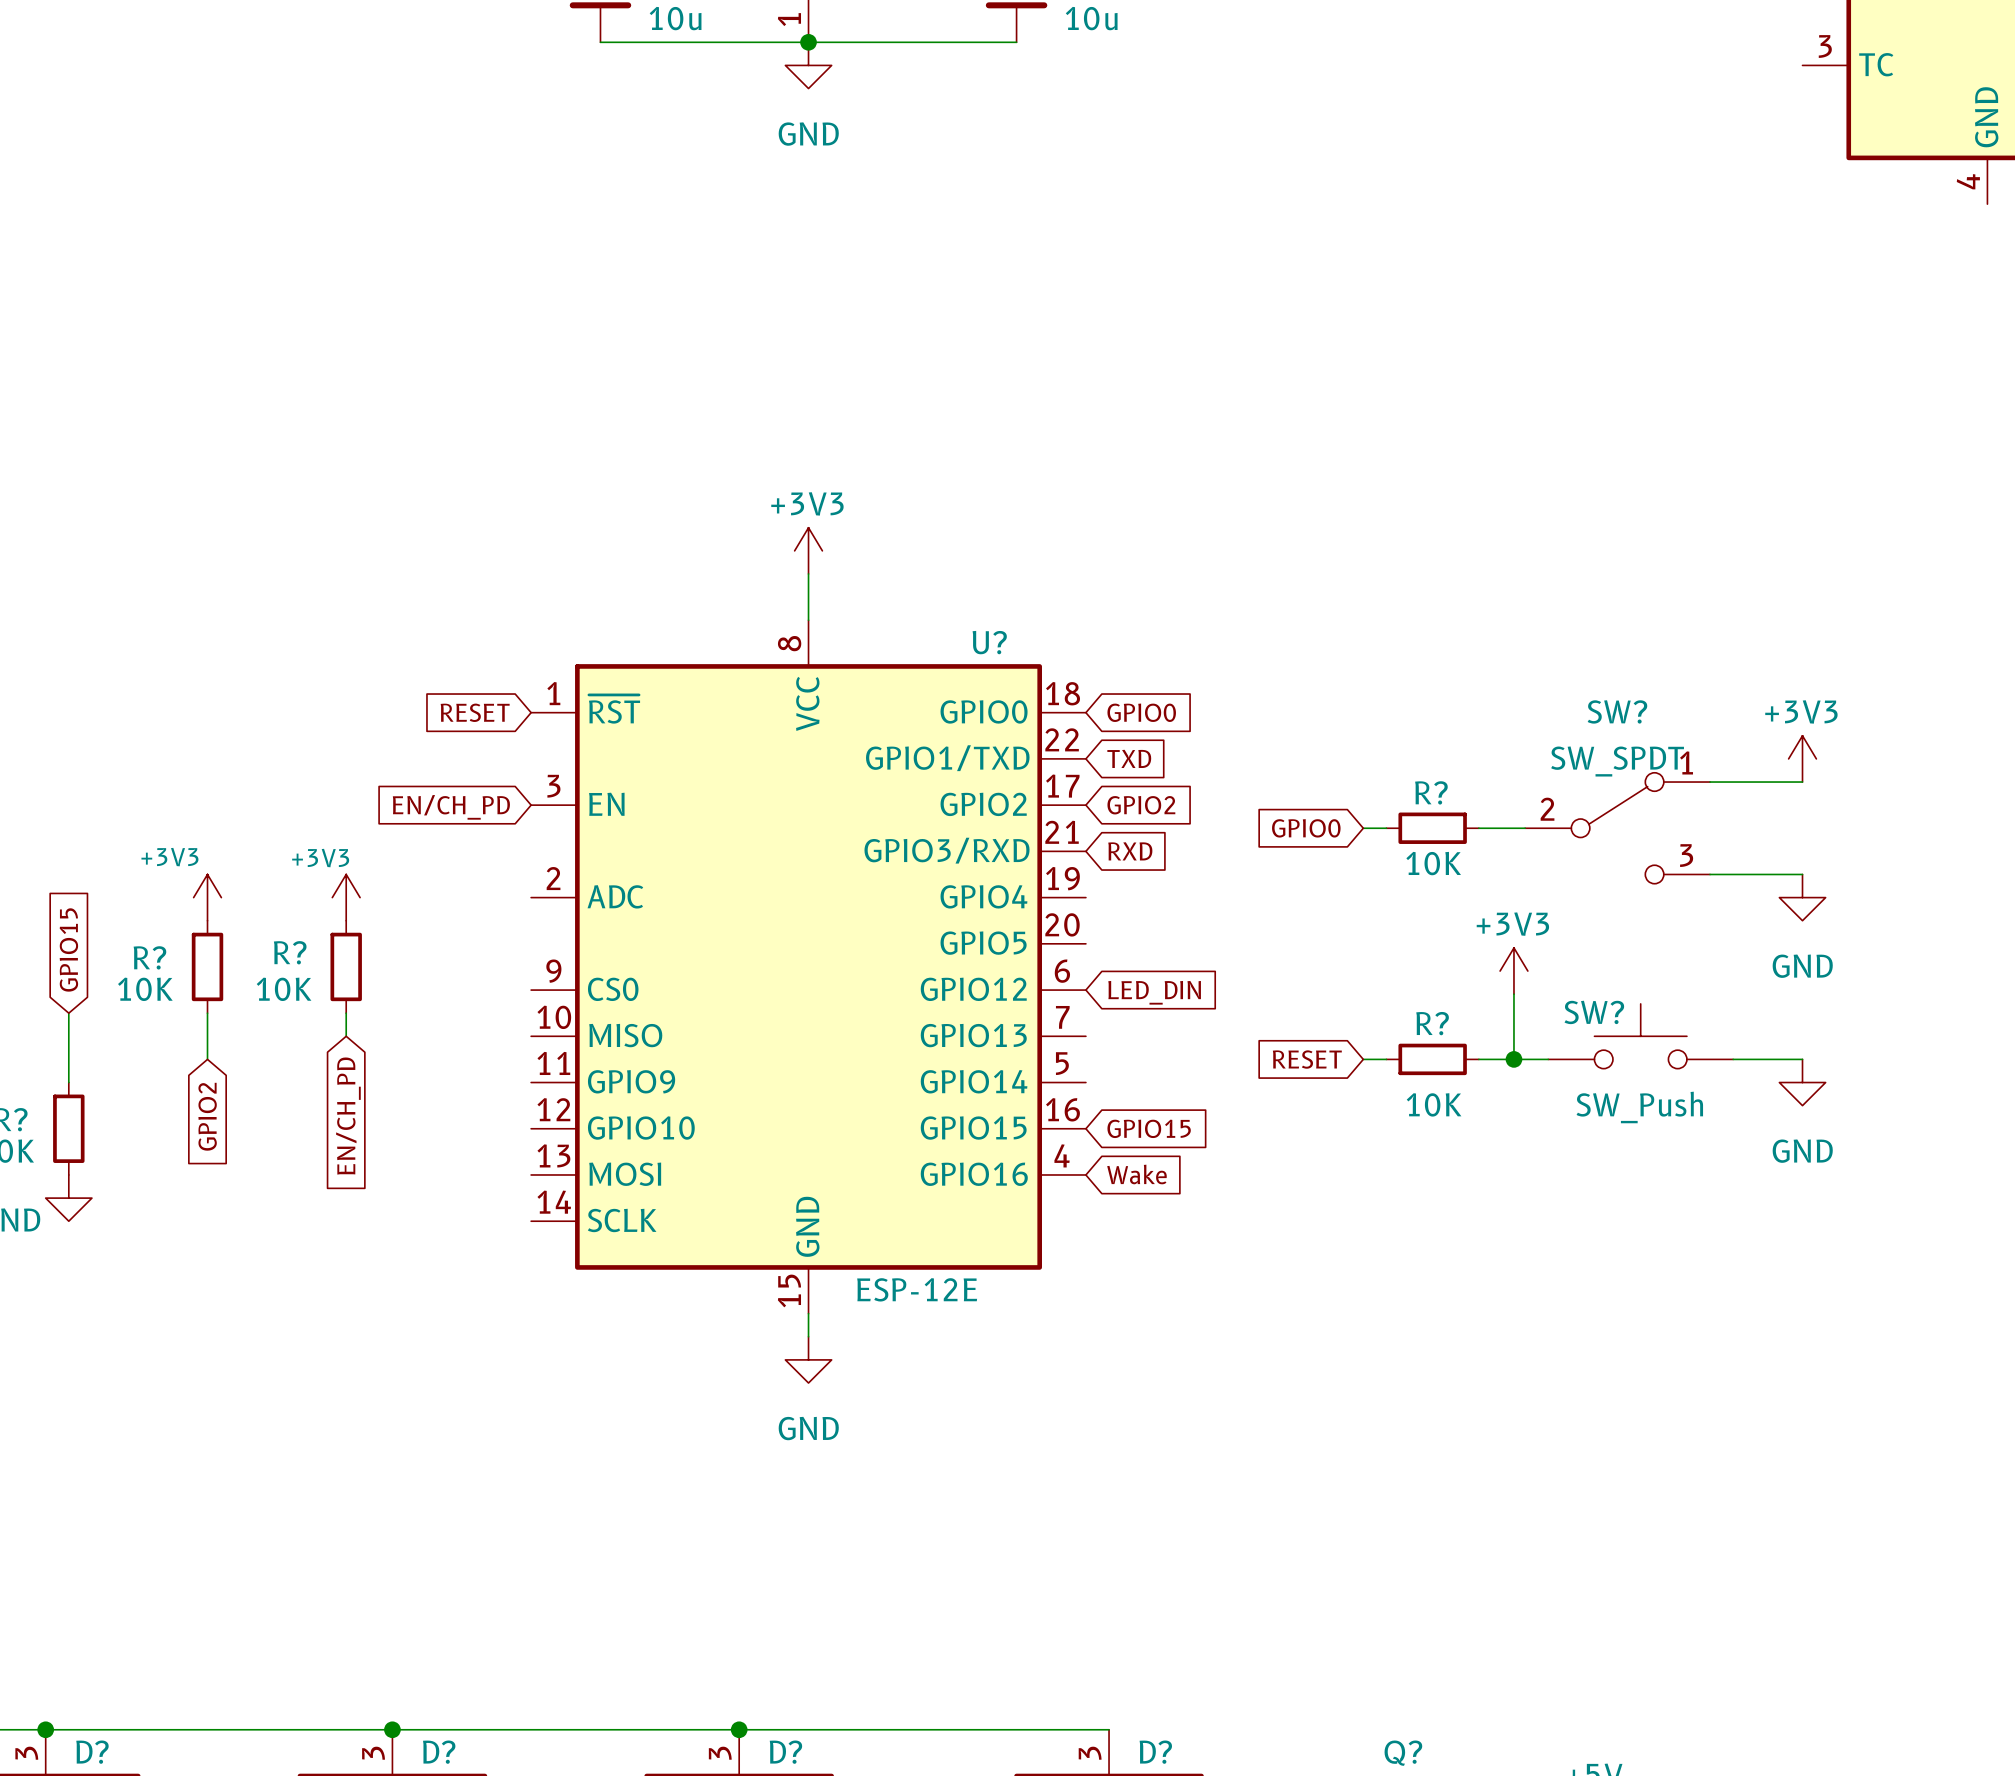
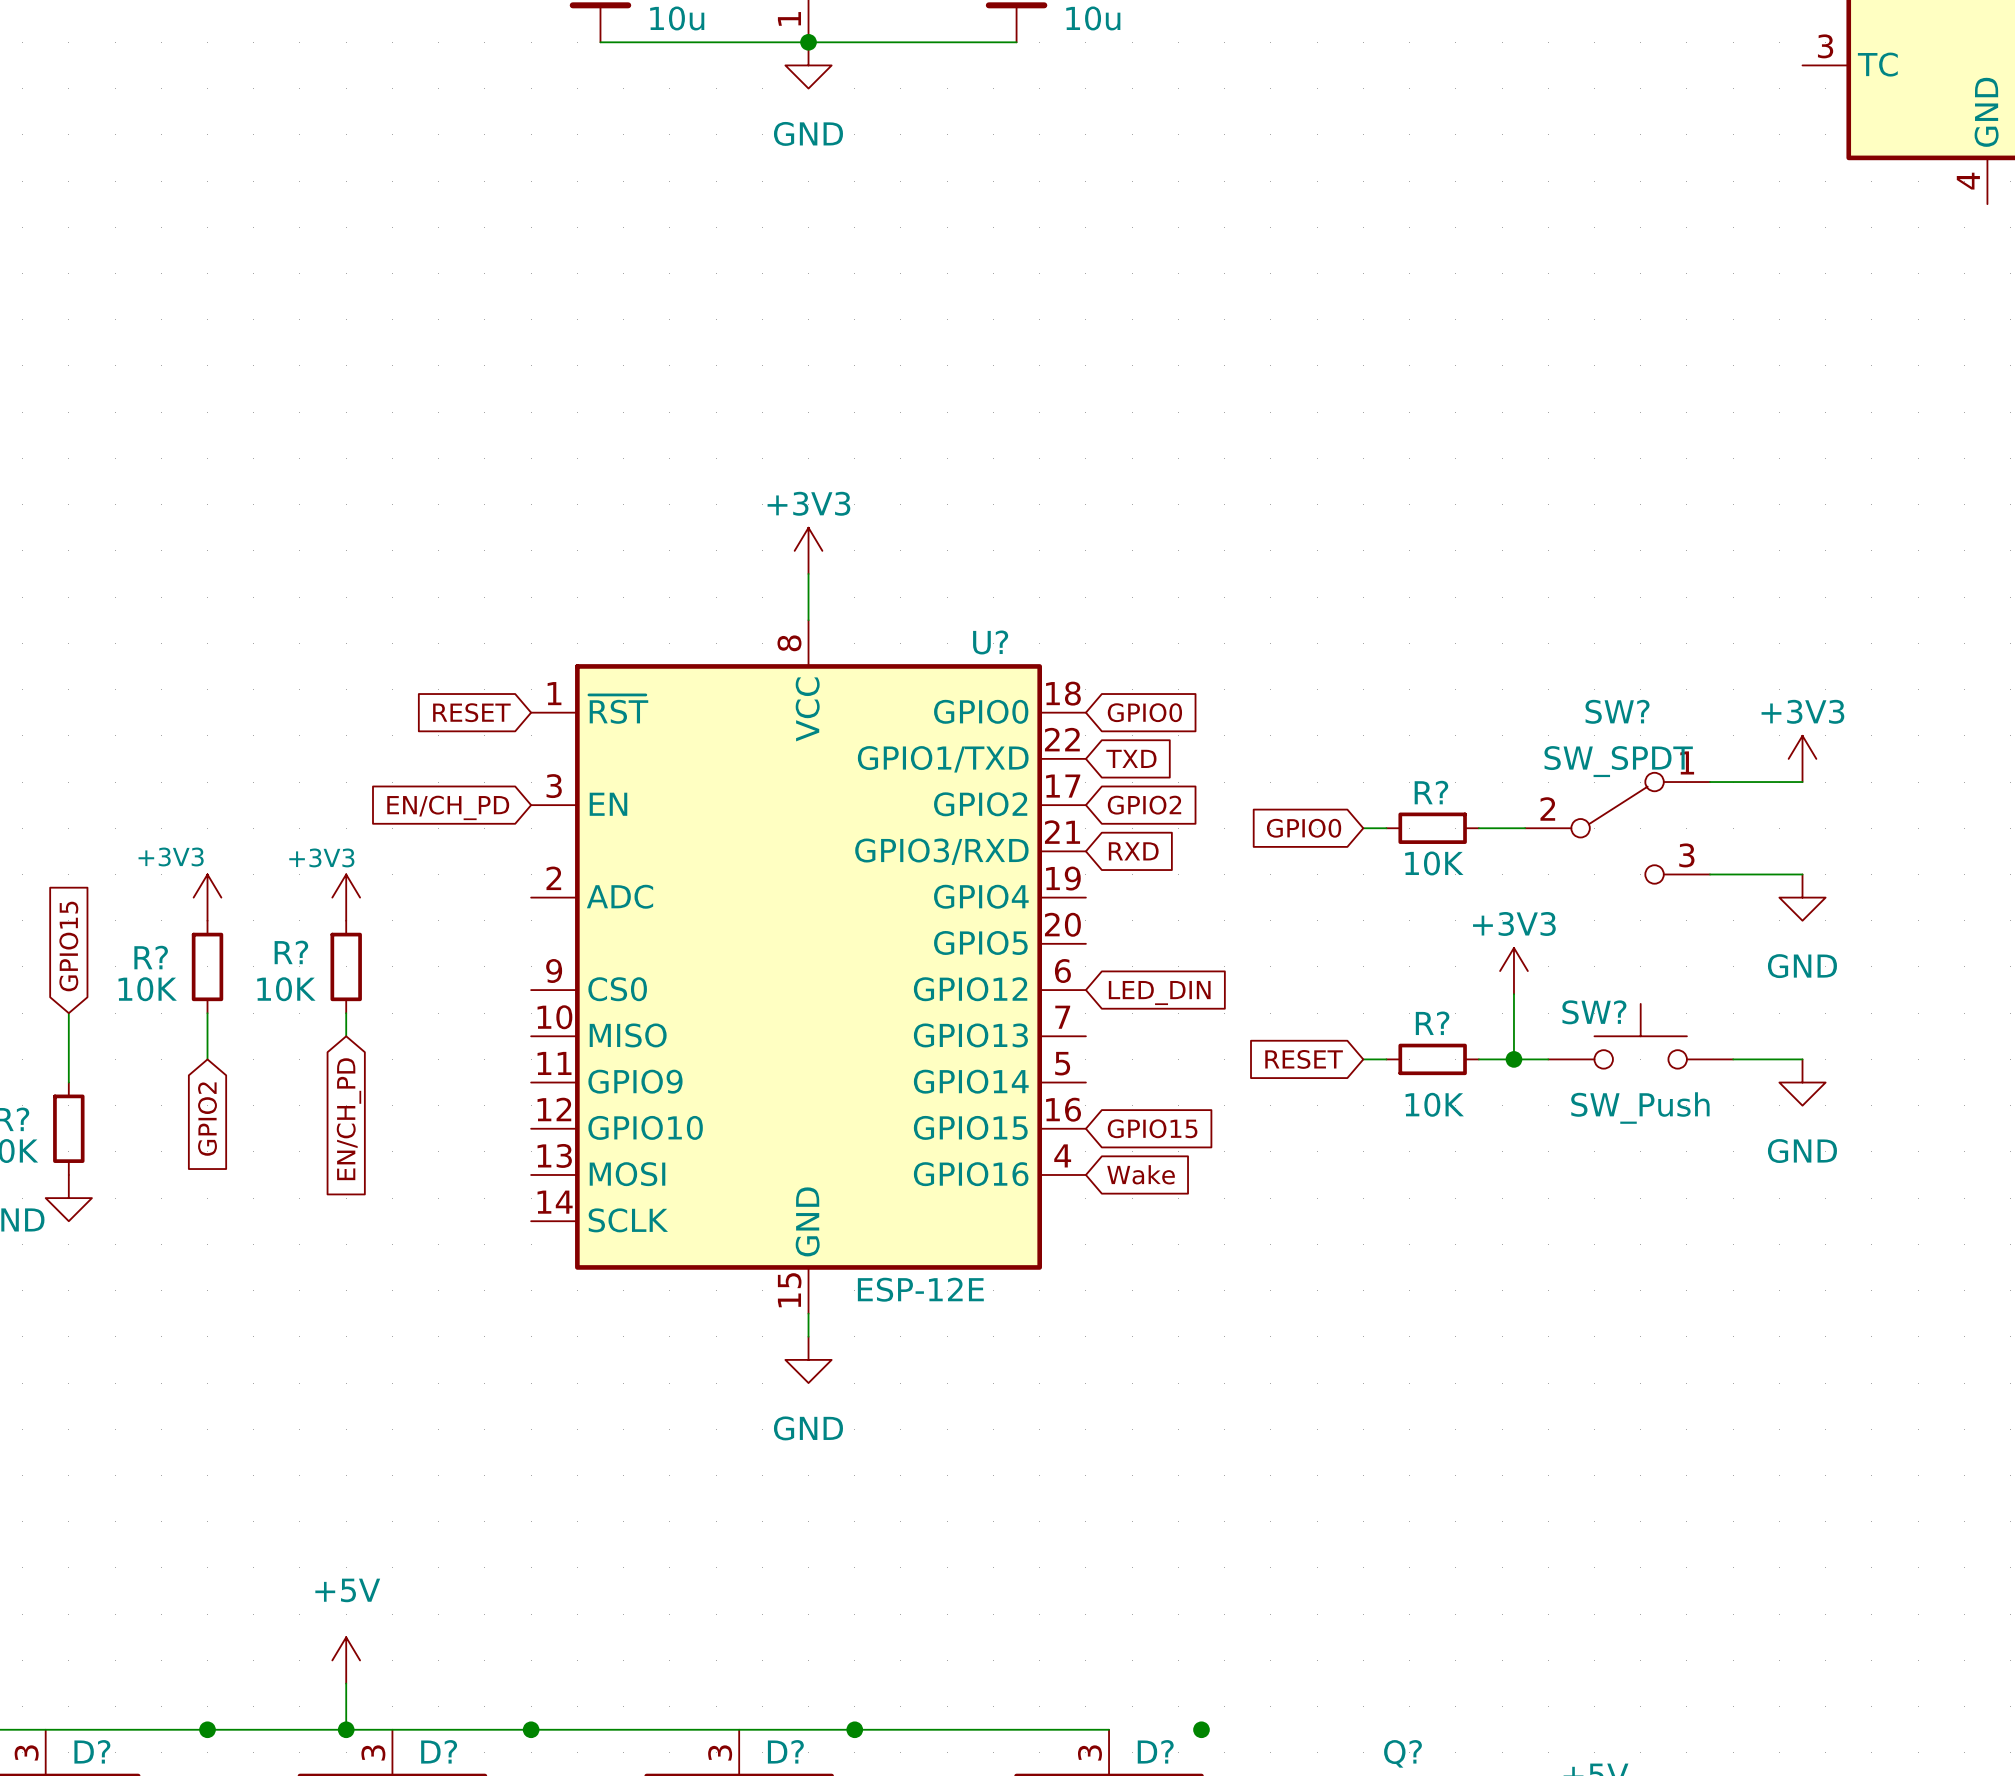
power symbol: none -> +5V (346, 1660)
wire: none -> (346, 1683) (346, 1729)
junction: (45, 1729) -> none
junction: none -> (207, 1729)
junction position: (392, 1729) -> (346, 1729)
junction: none -> (531, 1729)
junction: (739, 1729) -> none
junction: none -> (854, 1729)
junction: none -> (1201, 1729)

